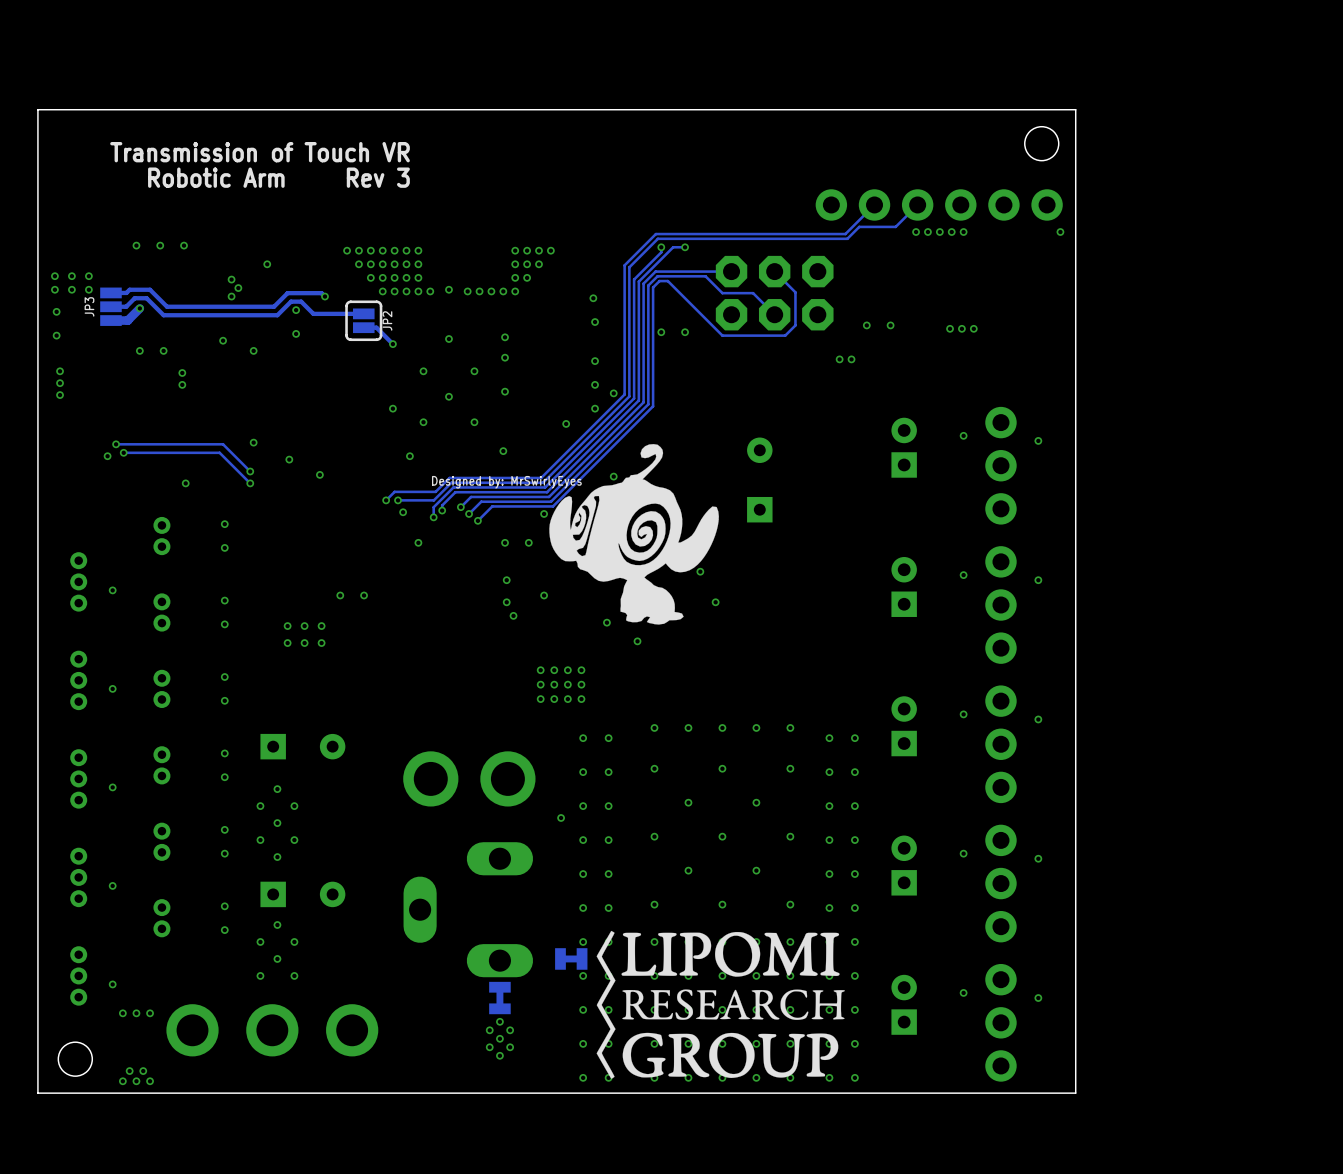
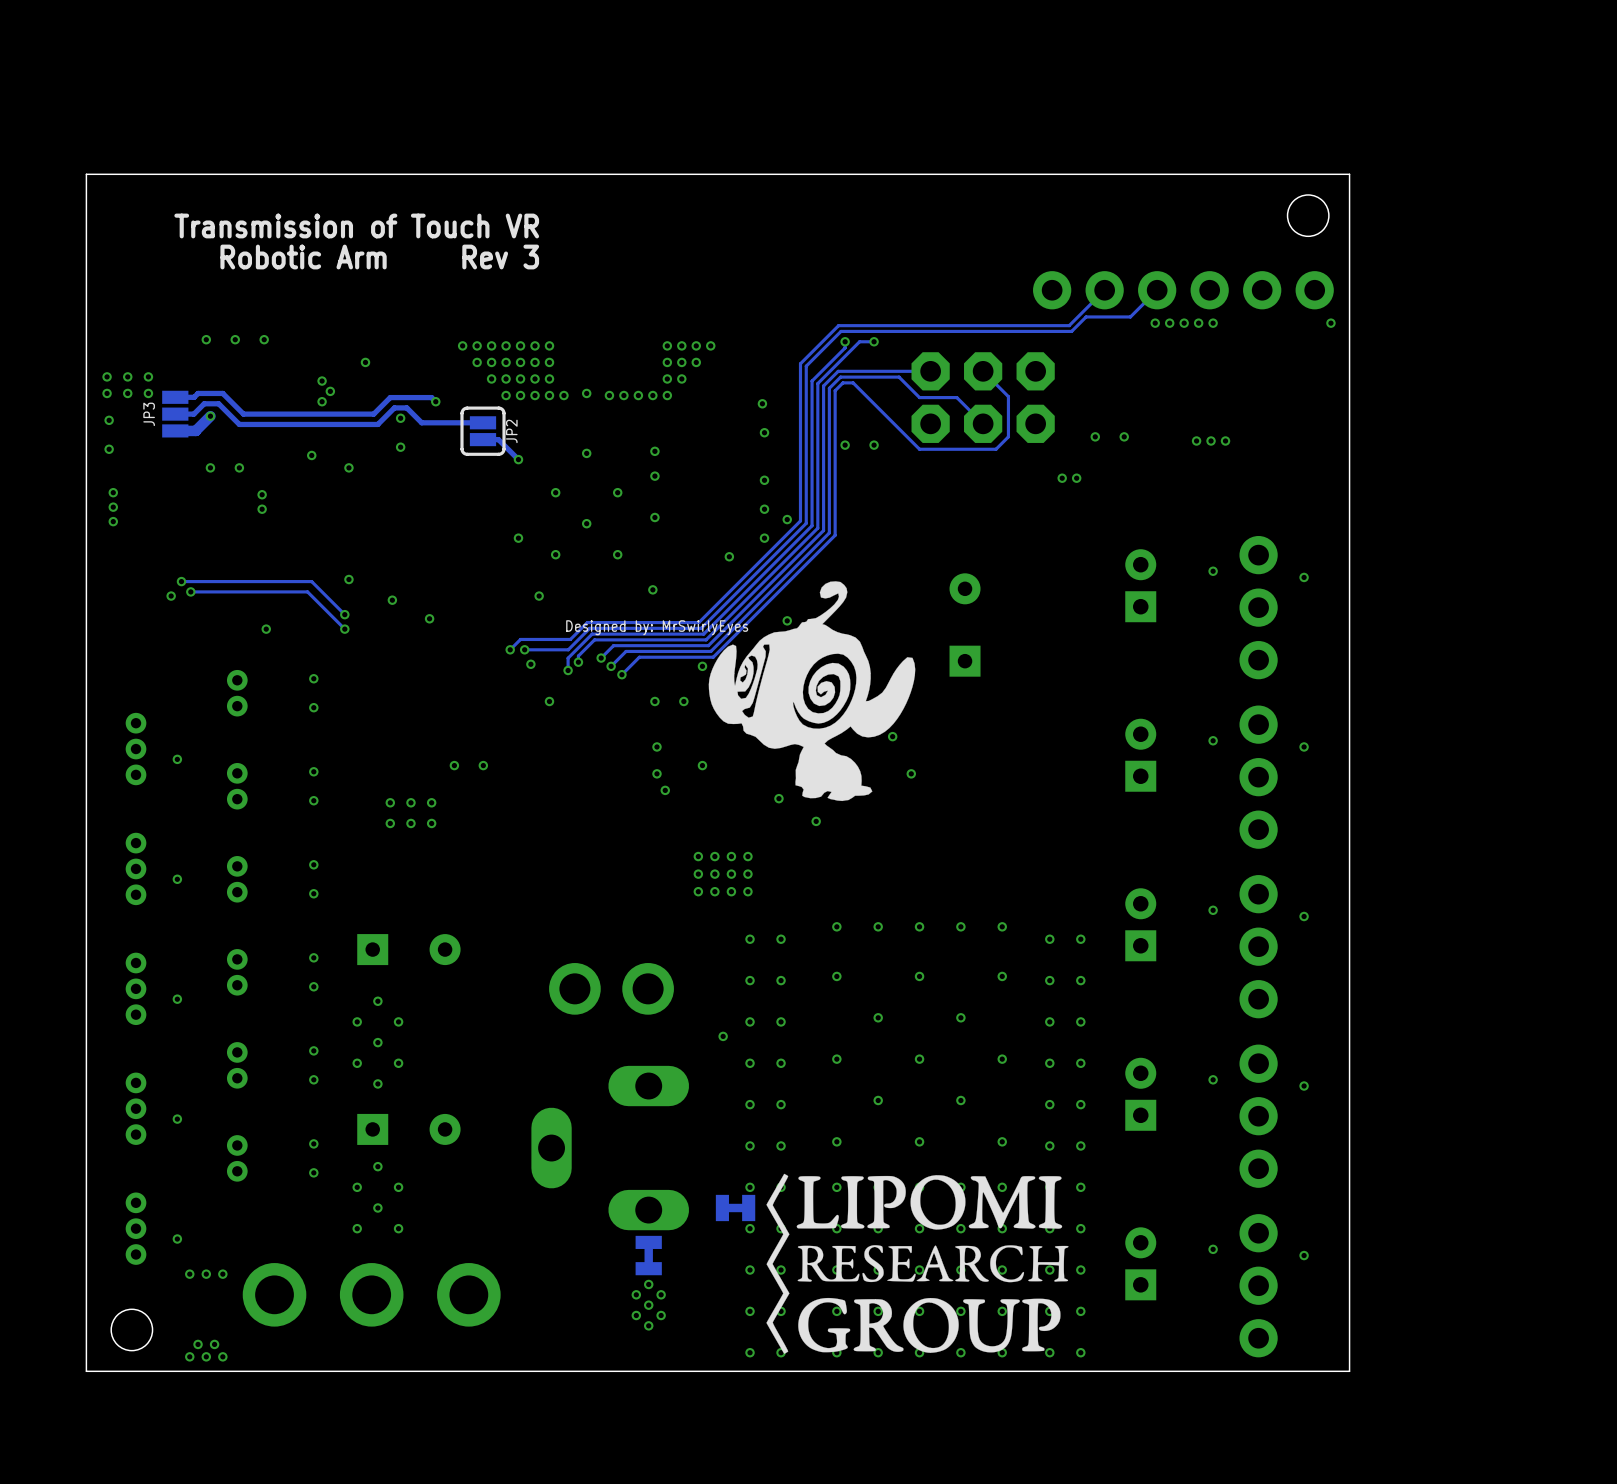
part footprint: [403, 751, 536, 807] -> [549, 963, 674, 1015]

